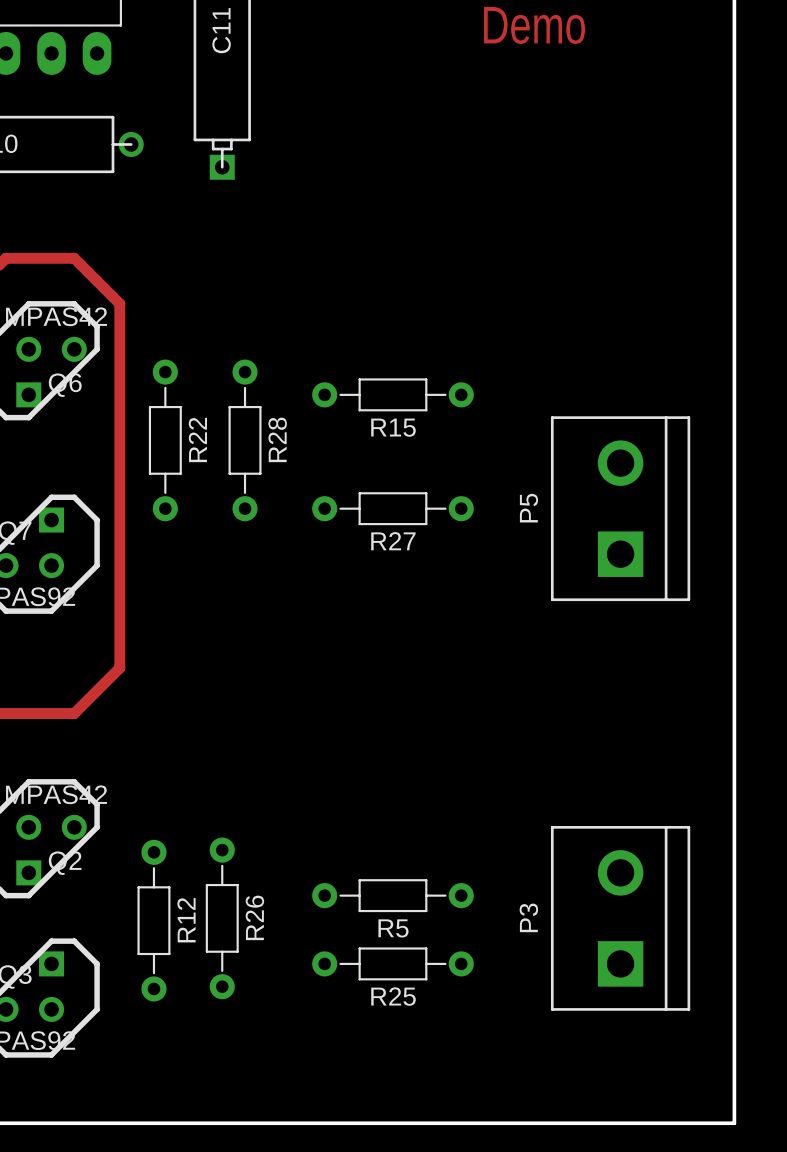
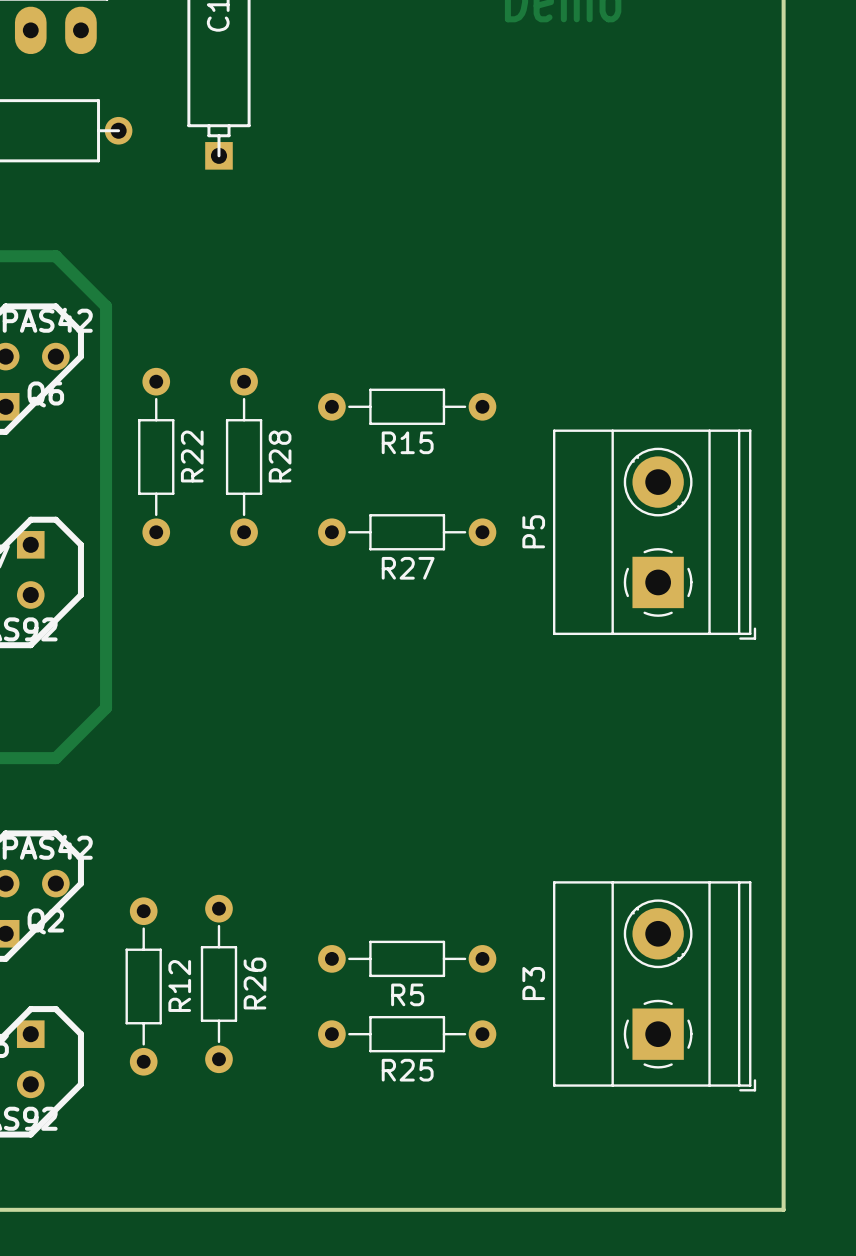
P5 footprint: [550, 416, 691, 602] -> [553, 429, 757, 640]
P3 footprint: [550, 826, 691, 1011] -> [553, 881, 757, 1092]

